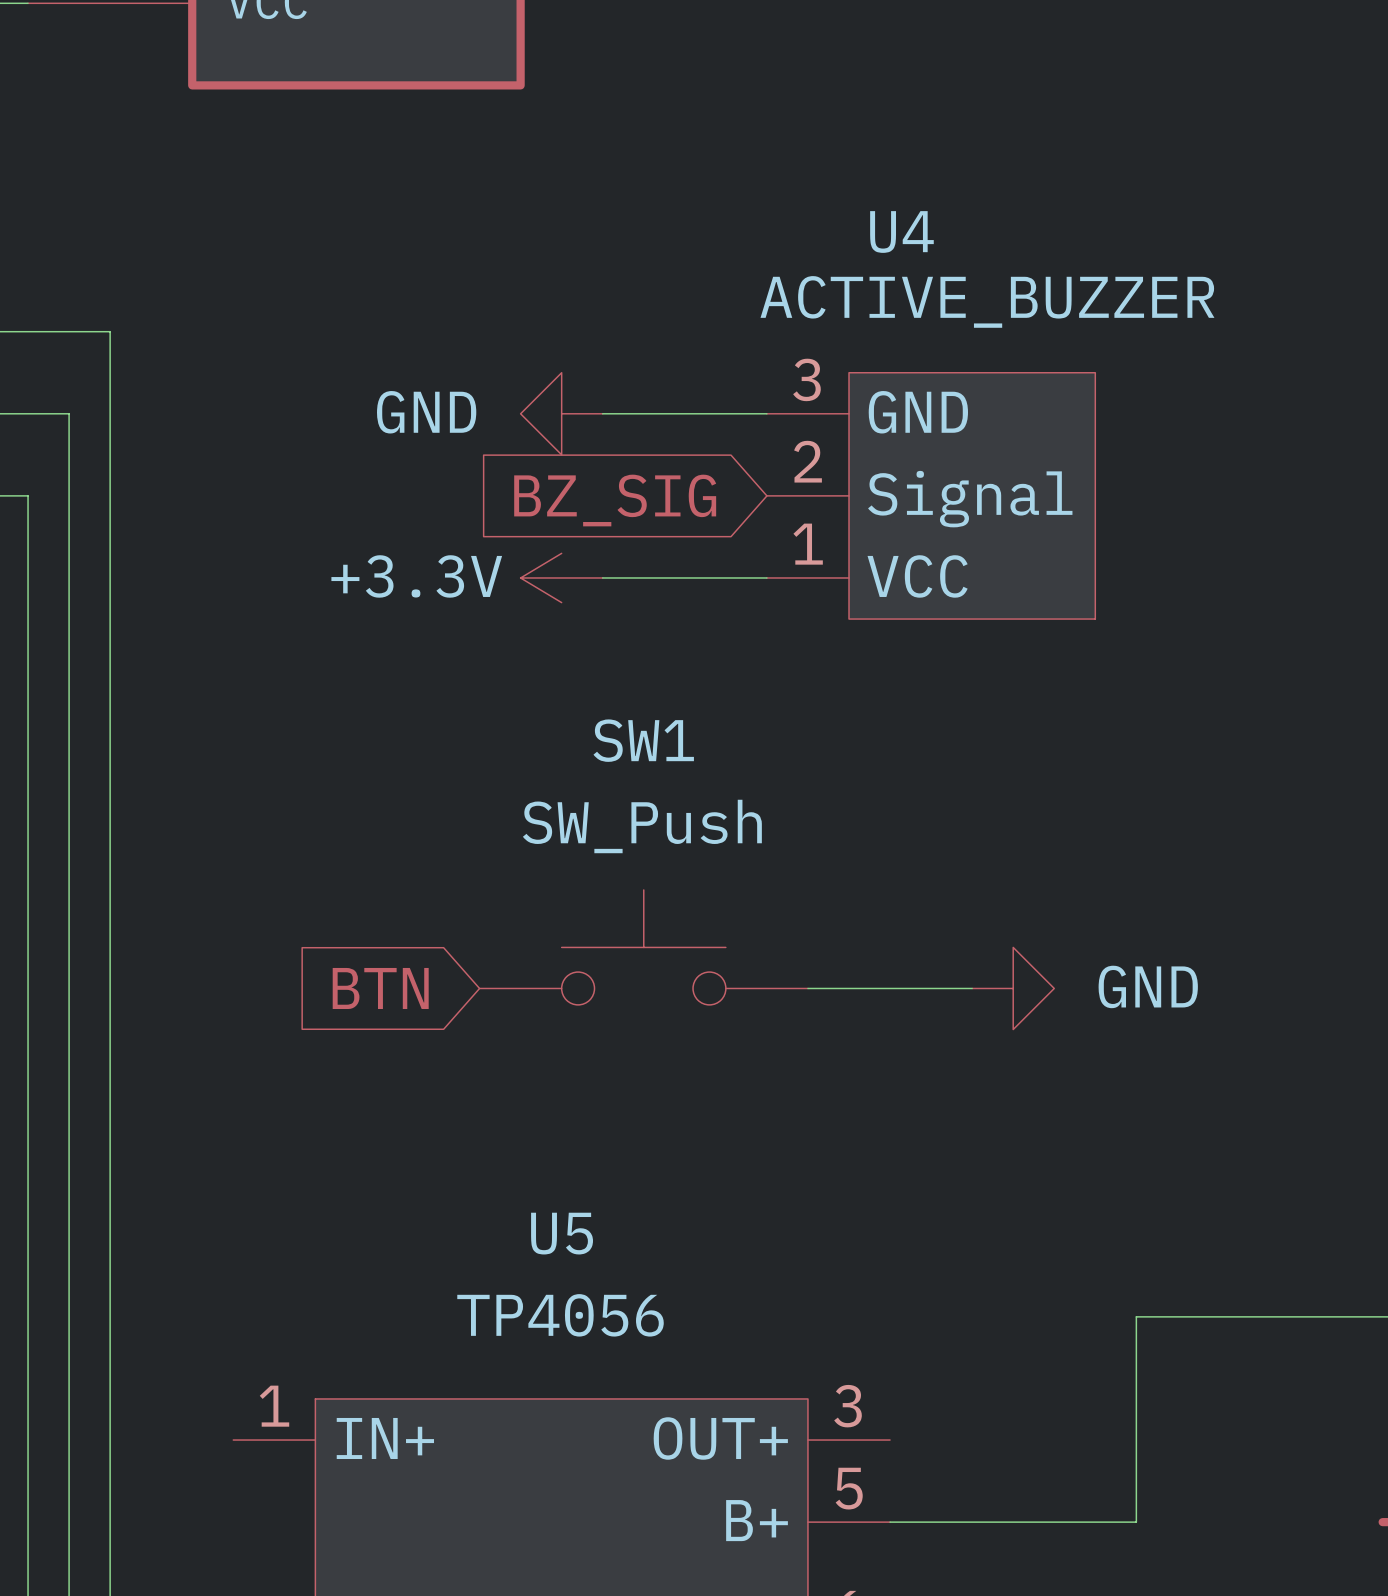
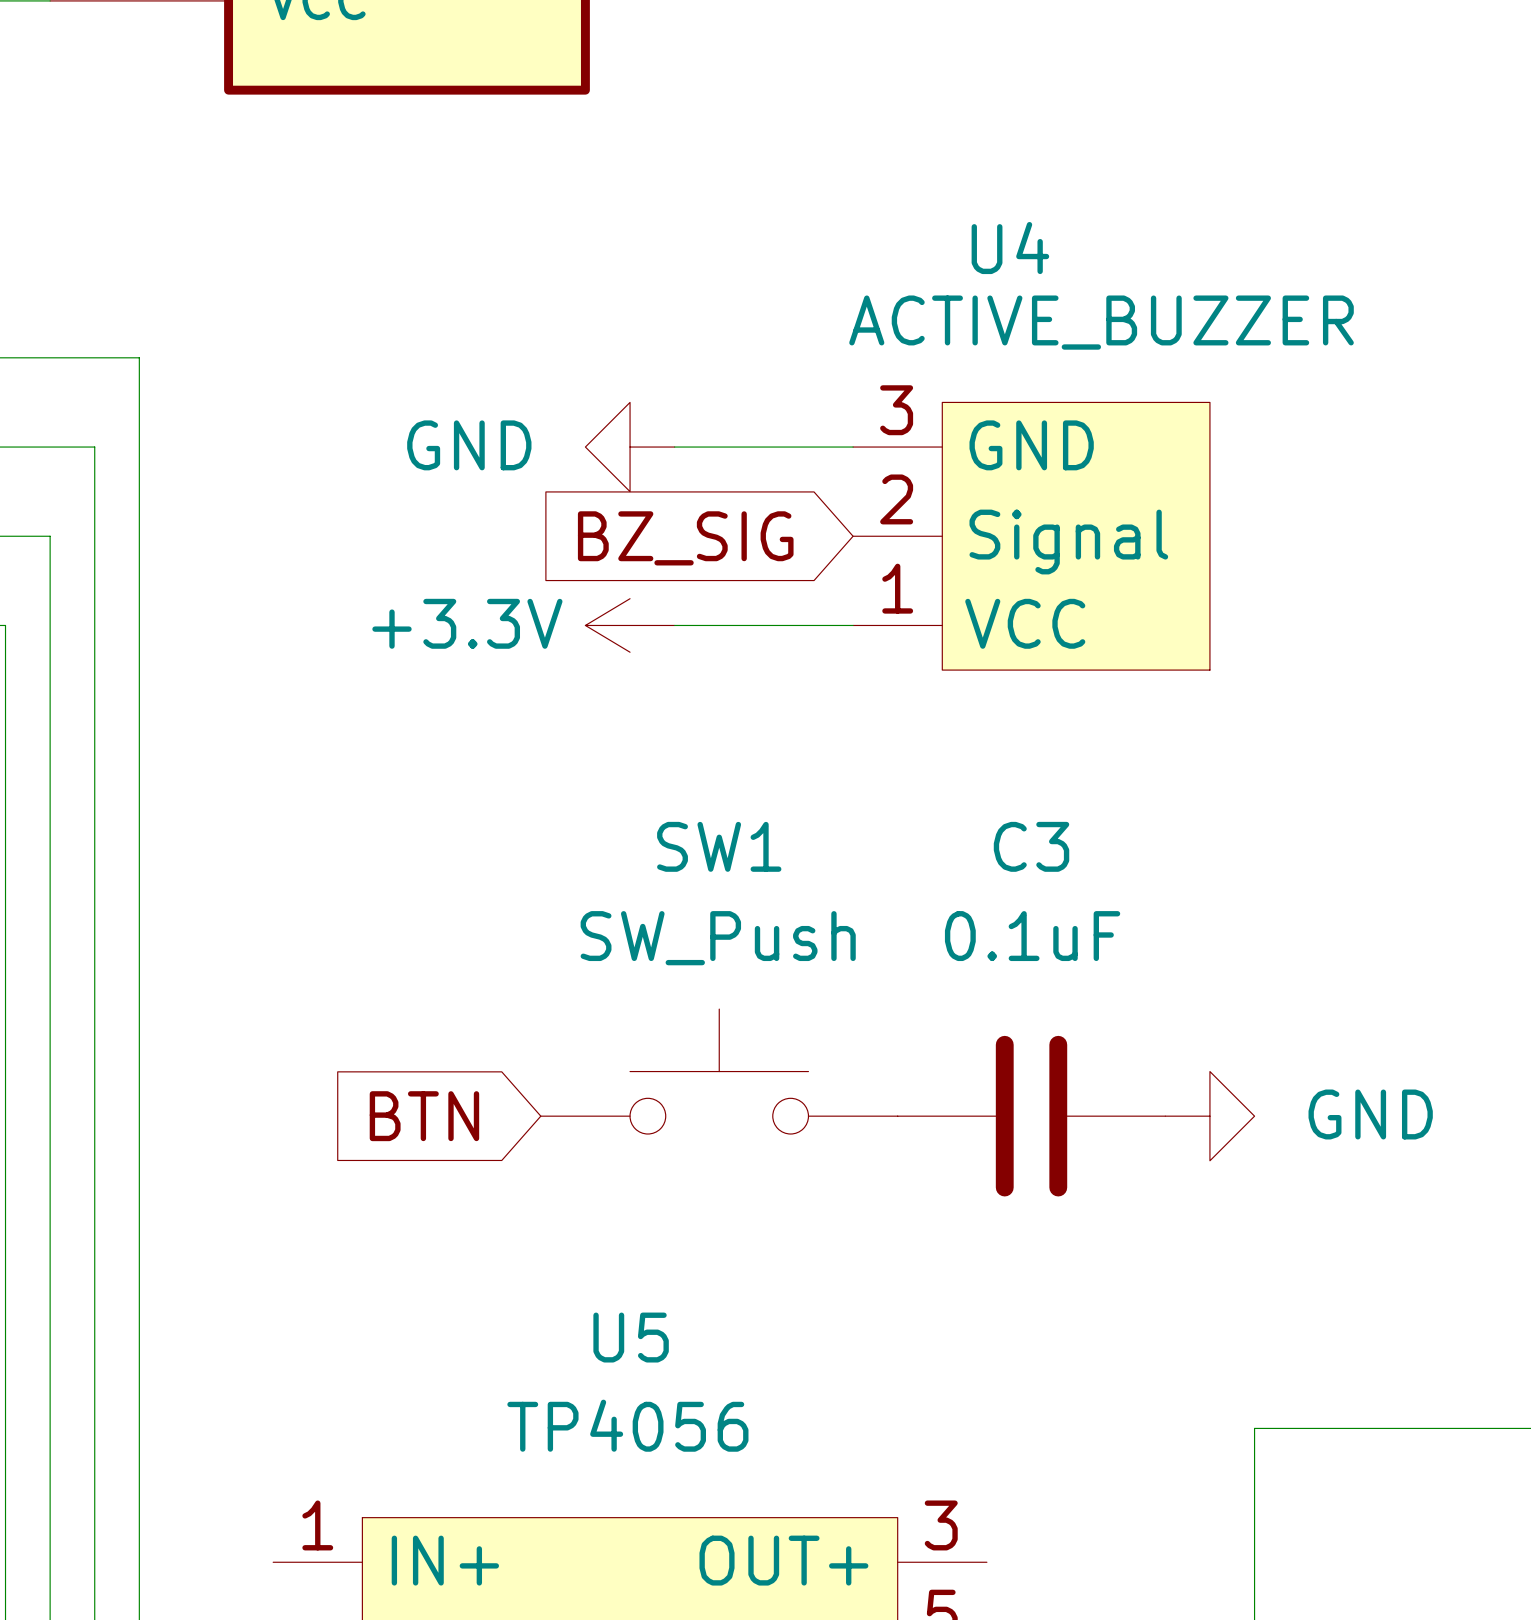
SW1 position: (643, 947) -> (719, 1071)
global label position: BTN (380, 988) -> BTN (424, 1116)
wire: (807, 988) (972, 988) -> none
power symbol position: GND (1013, 988) -> GND (1209, 1116)
C3: none -> 0.1uF (1031, 1116)

